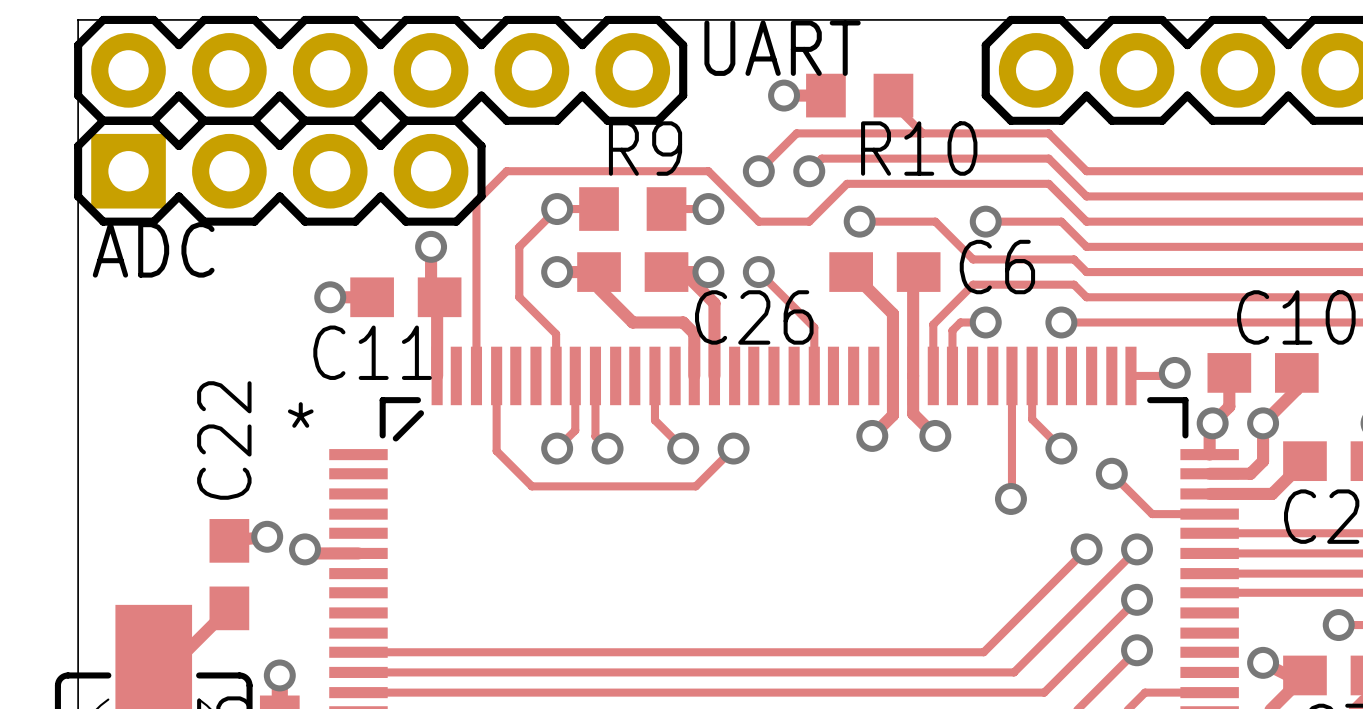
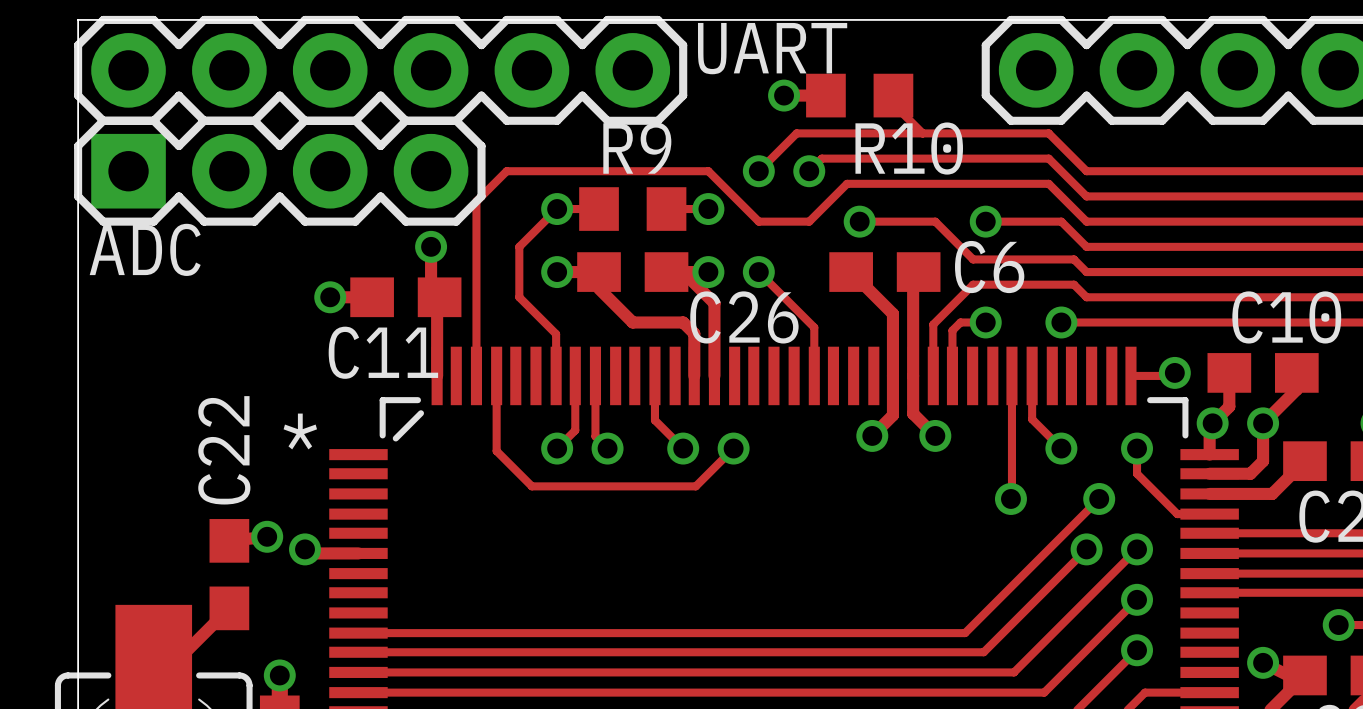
via: none -> (1137, 448)
track: (1111, 473) (1152, 514) (1177, 514) -> (1137, 448) (1137, 473) (1177, 514)
via: (1111, 473) -> none
track: none -> (1099, 498) (965, 633) (358, 633)
via: none -> (1099, 498)

